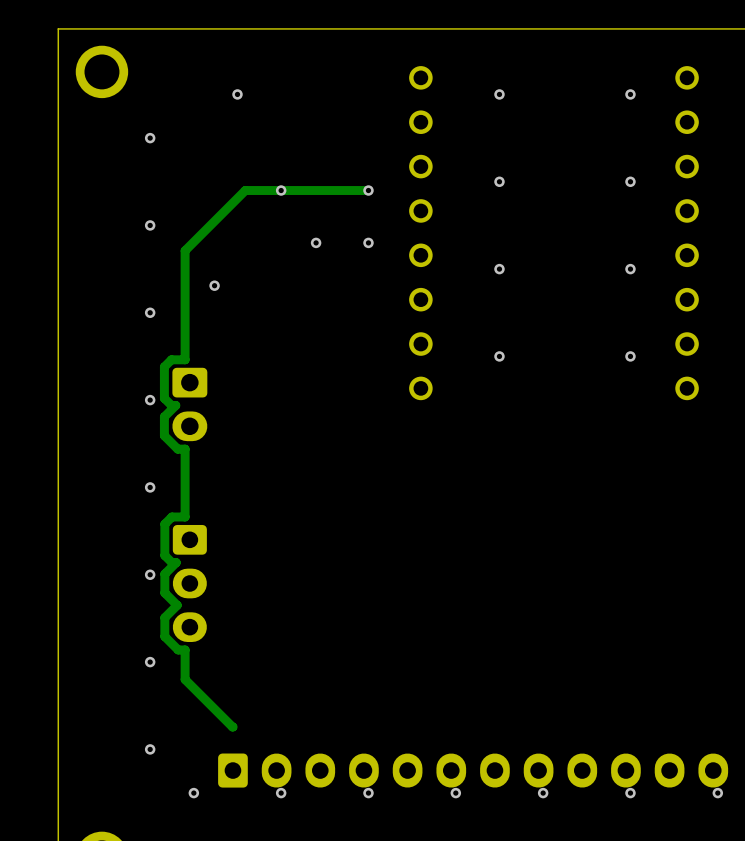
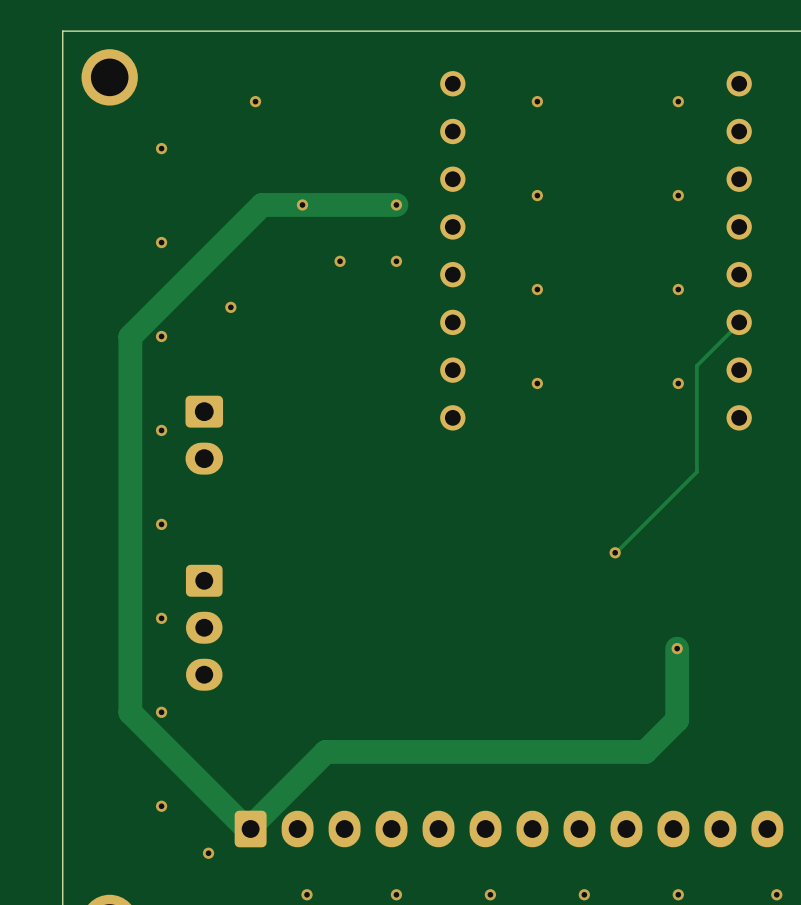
track: (245, 190) (185, 250) (185, 359) (171, 359) (164, 366) (164, 398) (171, 405) (175, 405) (164, 416) (164, 435) (177, 449) (185, 449) (185, 517) (171, 517) (164, 524) (164, 555) (171, 562) (176, 562) (164, 574) (164, 592) (177, 605) (164, 617) (164, 636) (178, 649) (185, 649) (185, 679) (233, 727) -> (263, 204) (130, 336) (130, 712) (246, 829) (250, 829) (325, 751) (645, 751) (677, 720) (677, 648)
track width: thin (368, 190) (245, 190) -> thick (396, 204) (263, 204)
track: none -> (739, 323) (696, 365) (696, 471) (615, 552)
via: none -> (615, 552)
via: none -> (677, 648)
via position: (281, 793) -> (307, 894)
via position: (368, 793) -> (396, 894)
via position: (455, 793) -> (490, 894)
via position: (543, 793) -> (584, 894)
via position: (630, 793) -> (678, 894)
via position: (717, 793) -> (776, 894)

